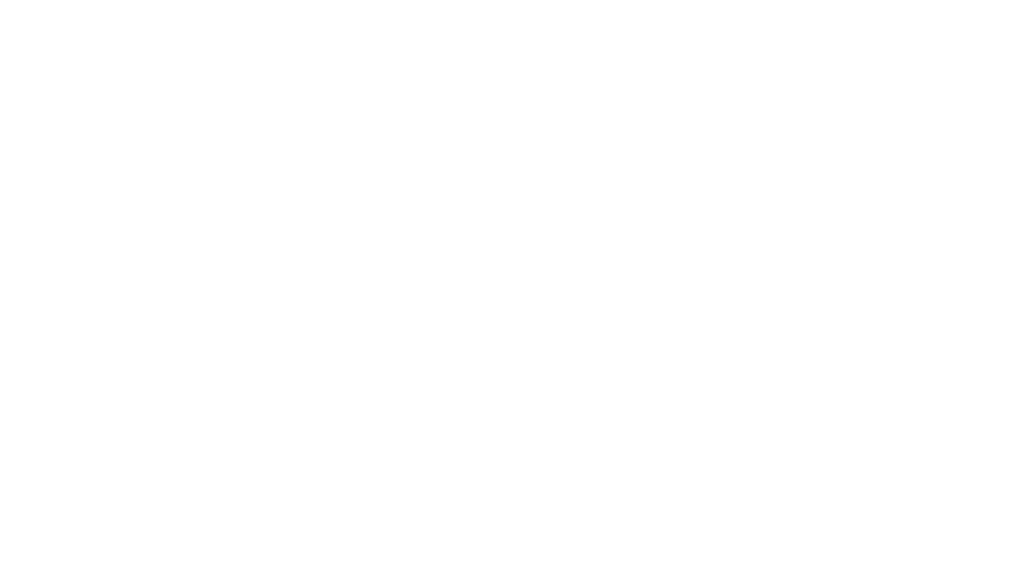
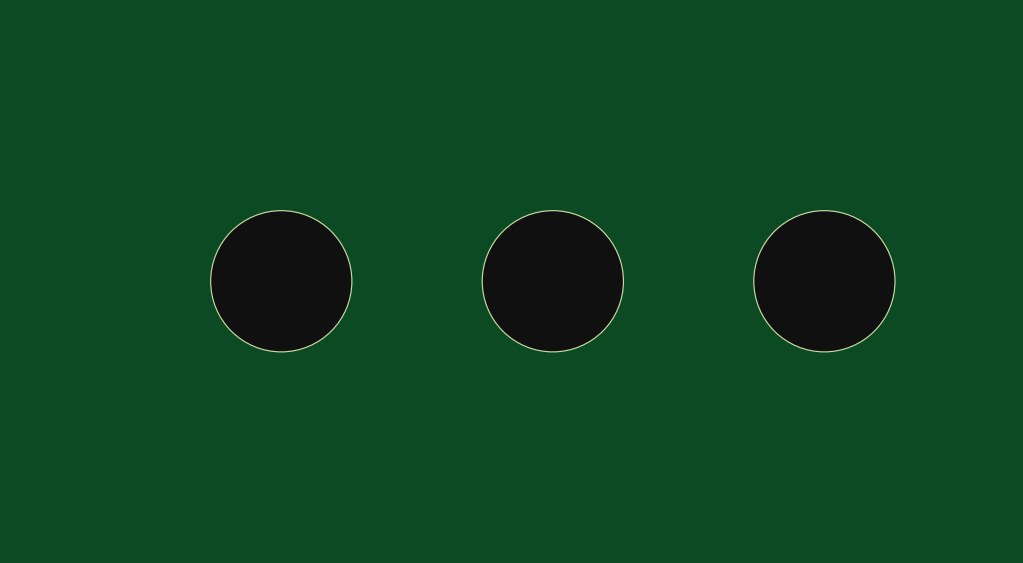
part: none -> (281, 281)
part: none -> (552, 281)
part: none -> (824, 281)

